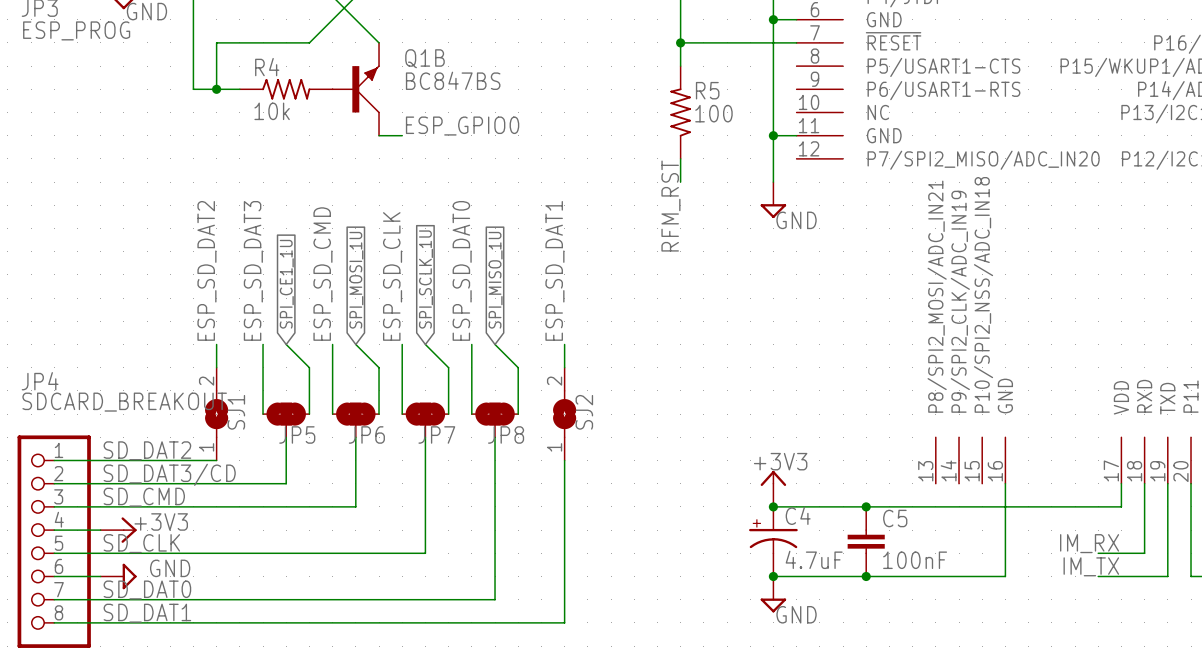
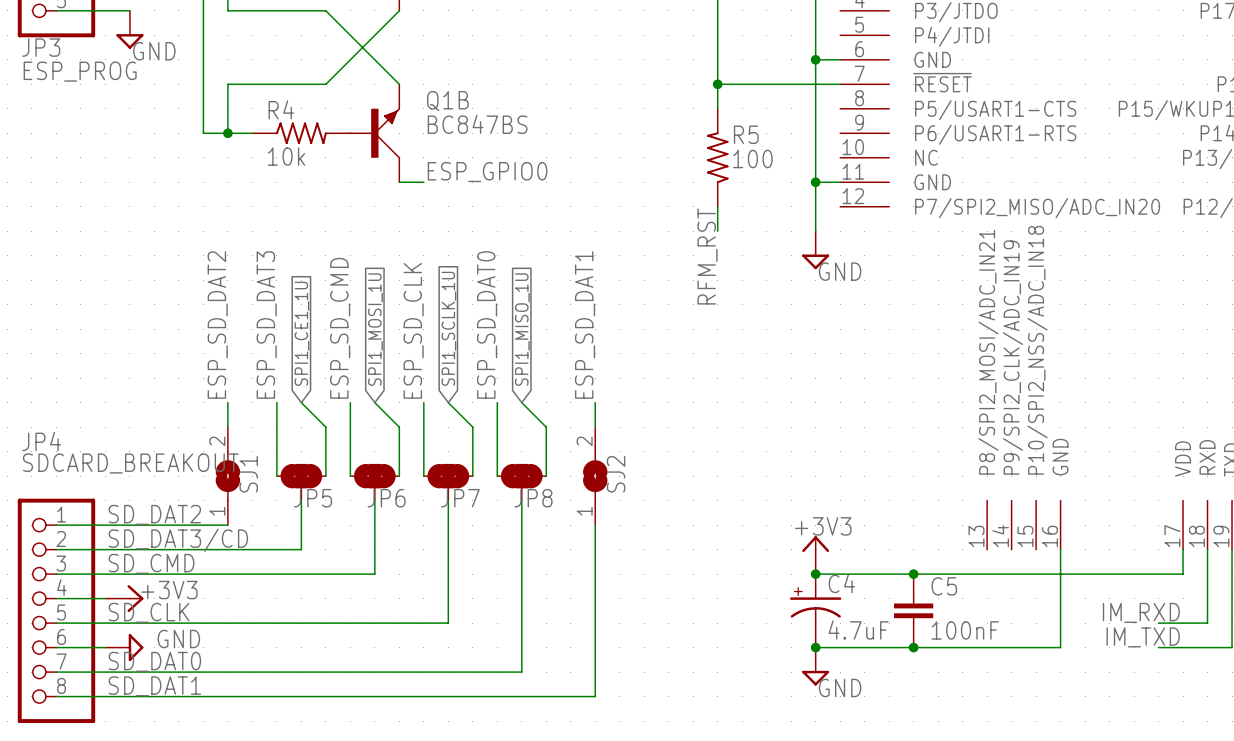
global label: SPI_SCLK_1U (425, 279) -> SPI1_SCLK_1U (448, 328)
global label: SPI_MOSI_1U (356, 280) -> SPI1_MOSI_1U (375, 329)
global label: SPI_MISO_1U (495, 280) -> SPI1_MISO_1U (522, 329)
global label: SPI_CE1_1U (286, 284) -> SPI1_CE1_1U (301, 333)
label: IM_RX (1089, 543) -> IM_RXD (1141, 612)
label: IM_TX (1091, 566) -> IM_TXD (1143, 637)

